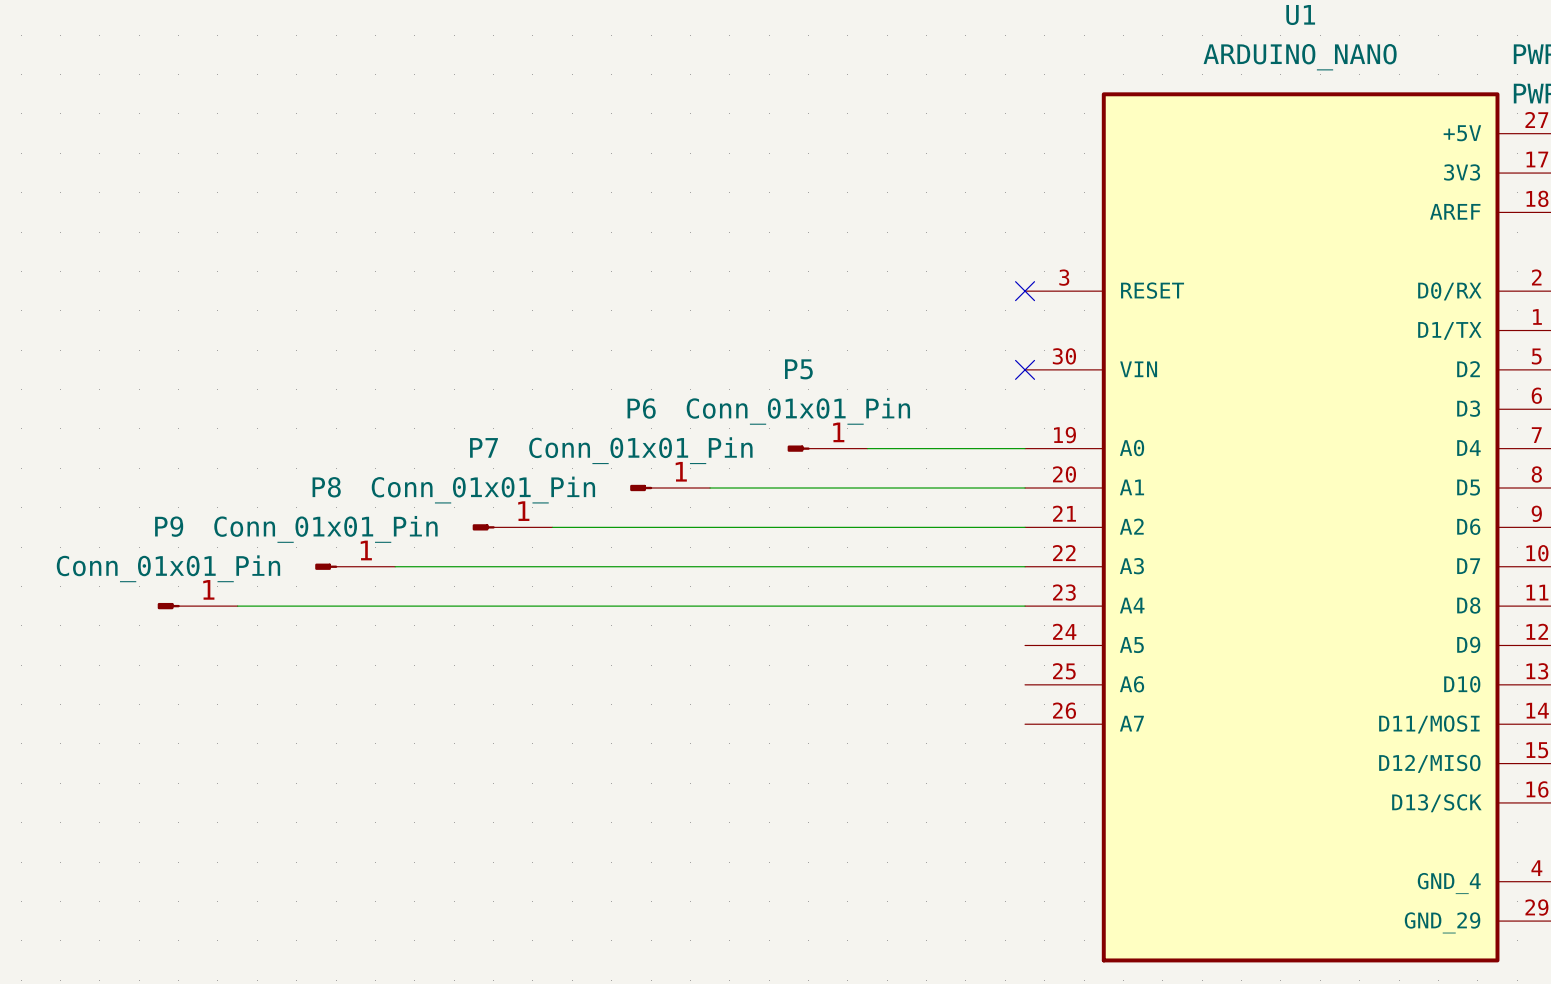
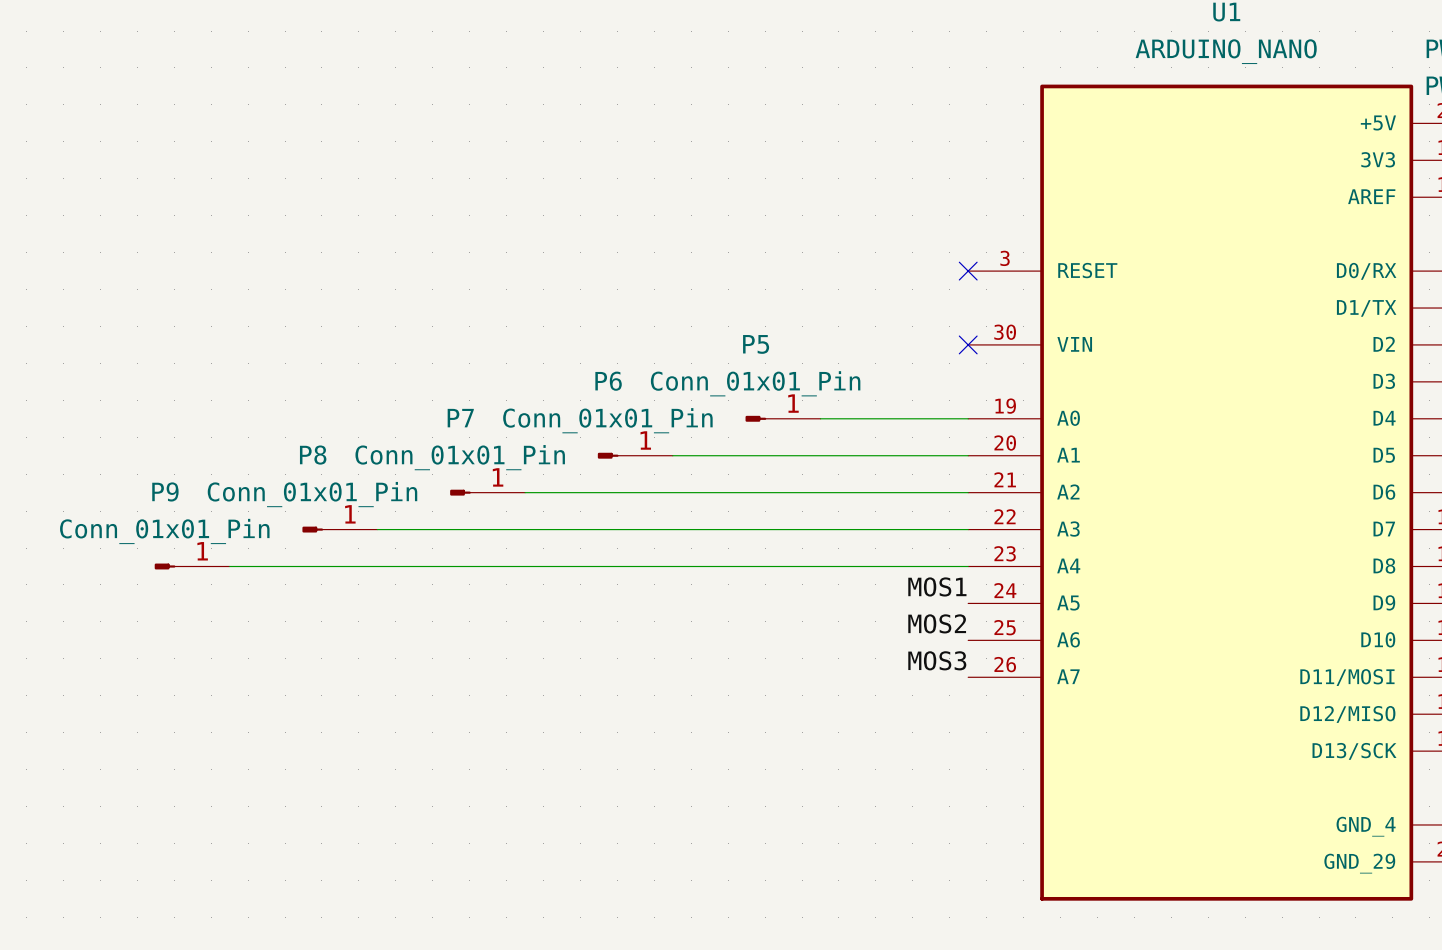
label: none -> MOS1 (937, 586)
label: none -> MOS2 (937, 623)
label: none -> MOS3 (937, 660)

